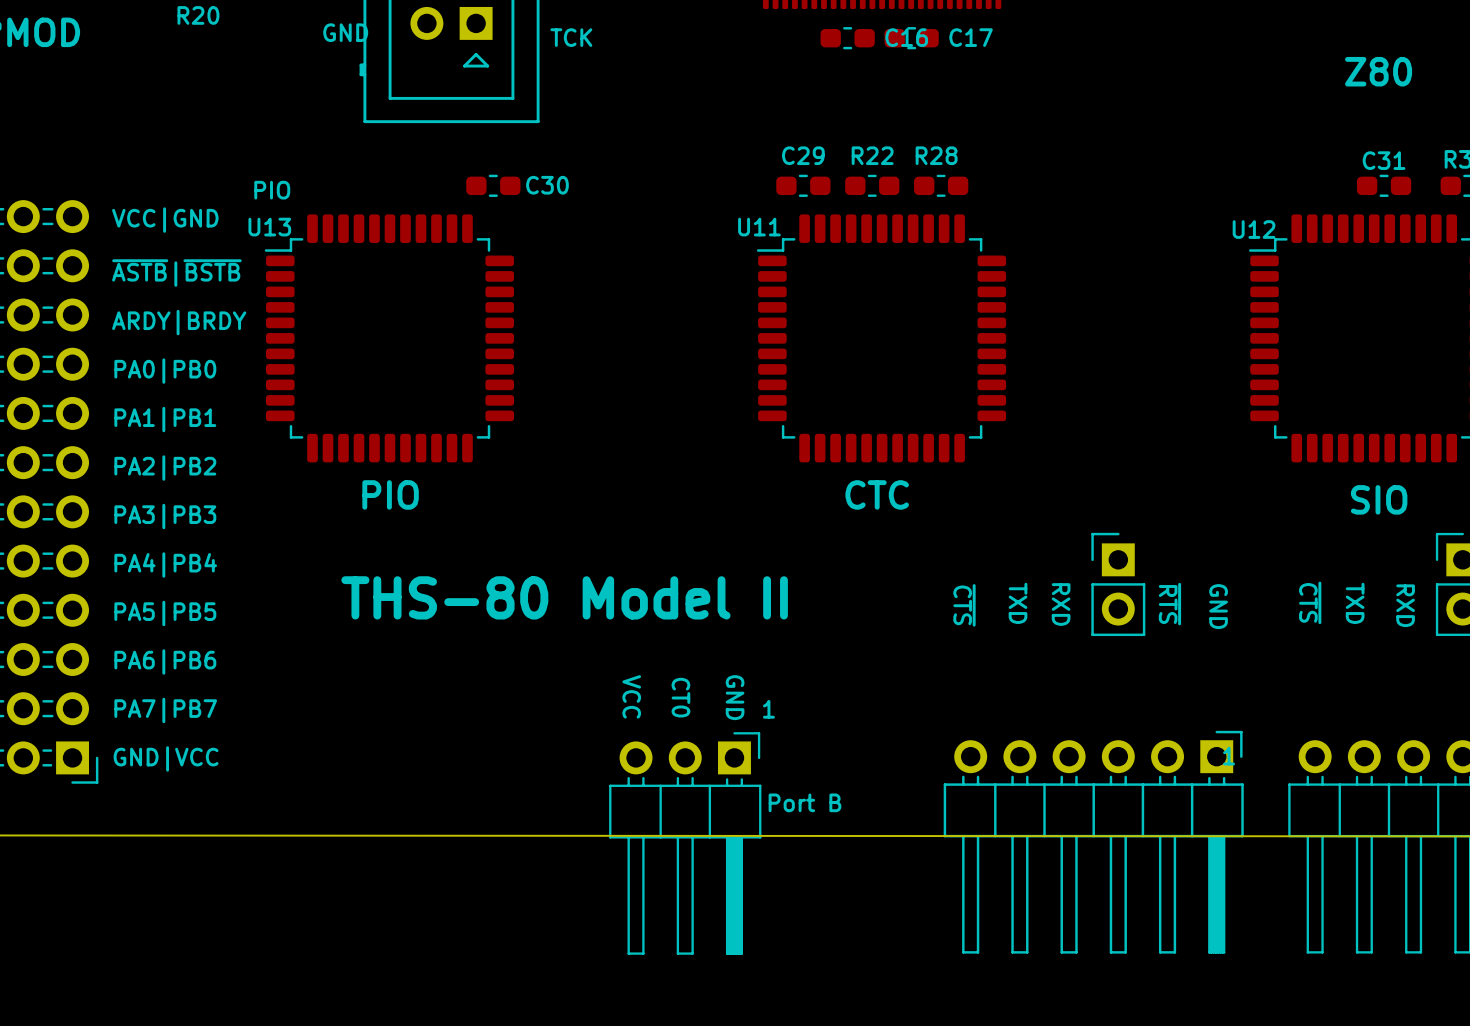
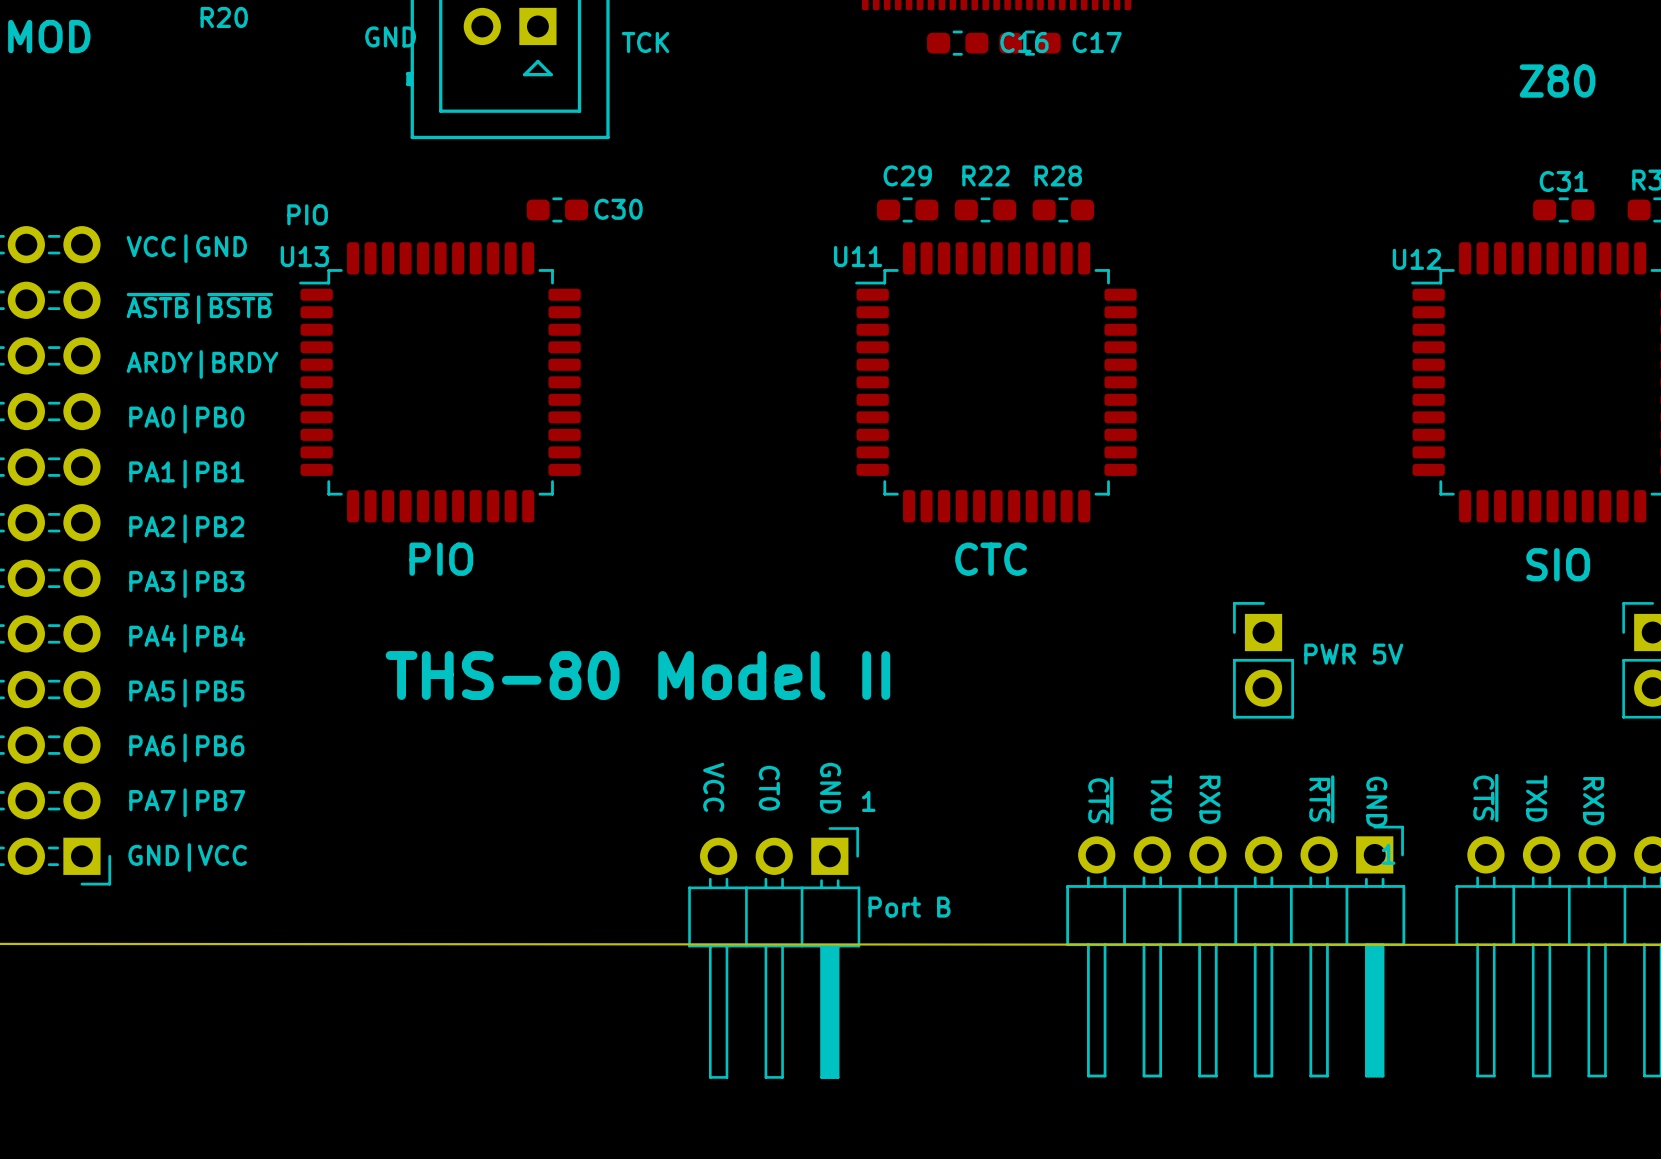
text: none -> PWR 5V (1353, 654)
text position: ~{CTS} (1310, 602) -> ~{CTS} (1485, 797)
text position: TXD (1018, 603) -> TXD (1161, 798)
text position: TXD (1355, 603) -> TXD (1536, 798)
text position: RXD (1061, 604) -> RXD (1209, 799)
text position: ~{RTS} (1169, 604) -> ~{RTS} (1321, 799)
text position: ~{CTS} (964, 605) -> ~{CTS} (1100, 800)
text position: RXD (1405, 605) -> RXD (1593, 801)
text position: GND (1218, 606) -> GND (1376, 802)

